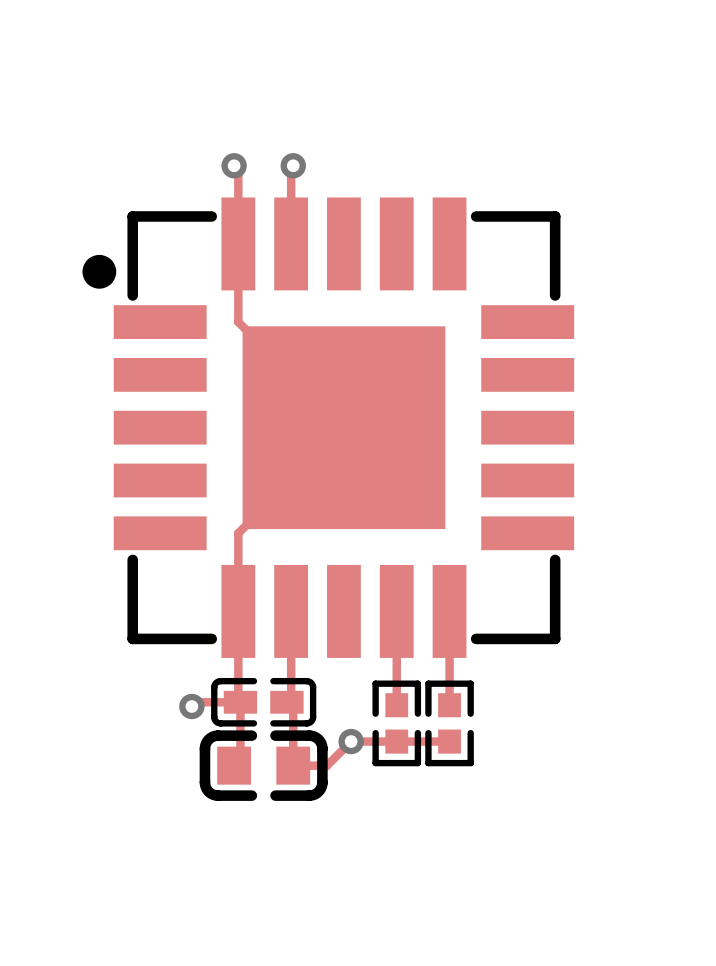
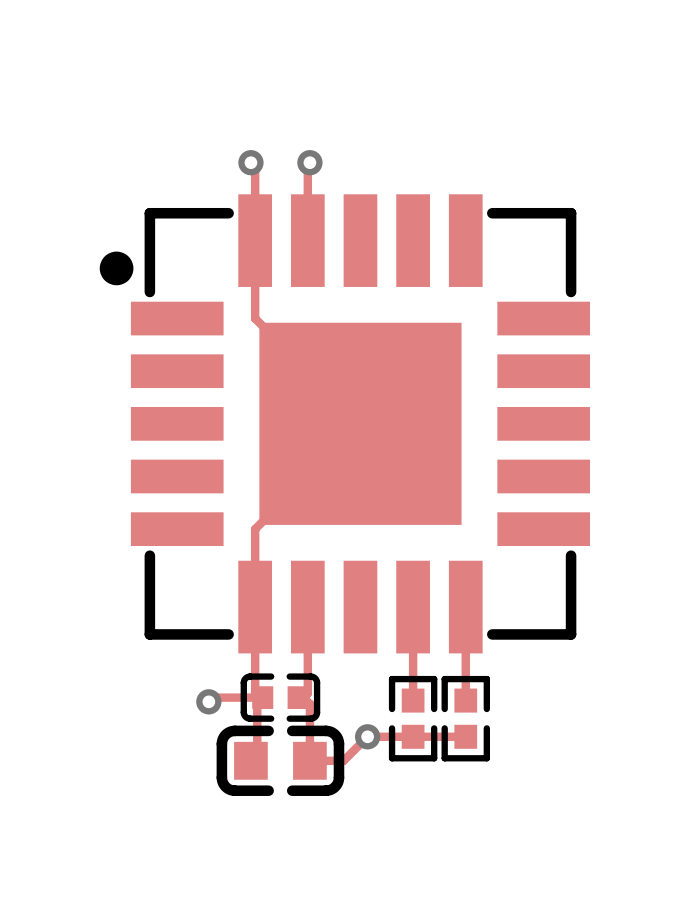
part footprint: [211, 677, 317, 727] -> [240, 673, 321, 722]

